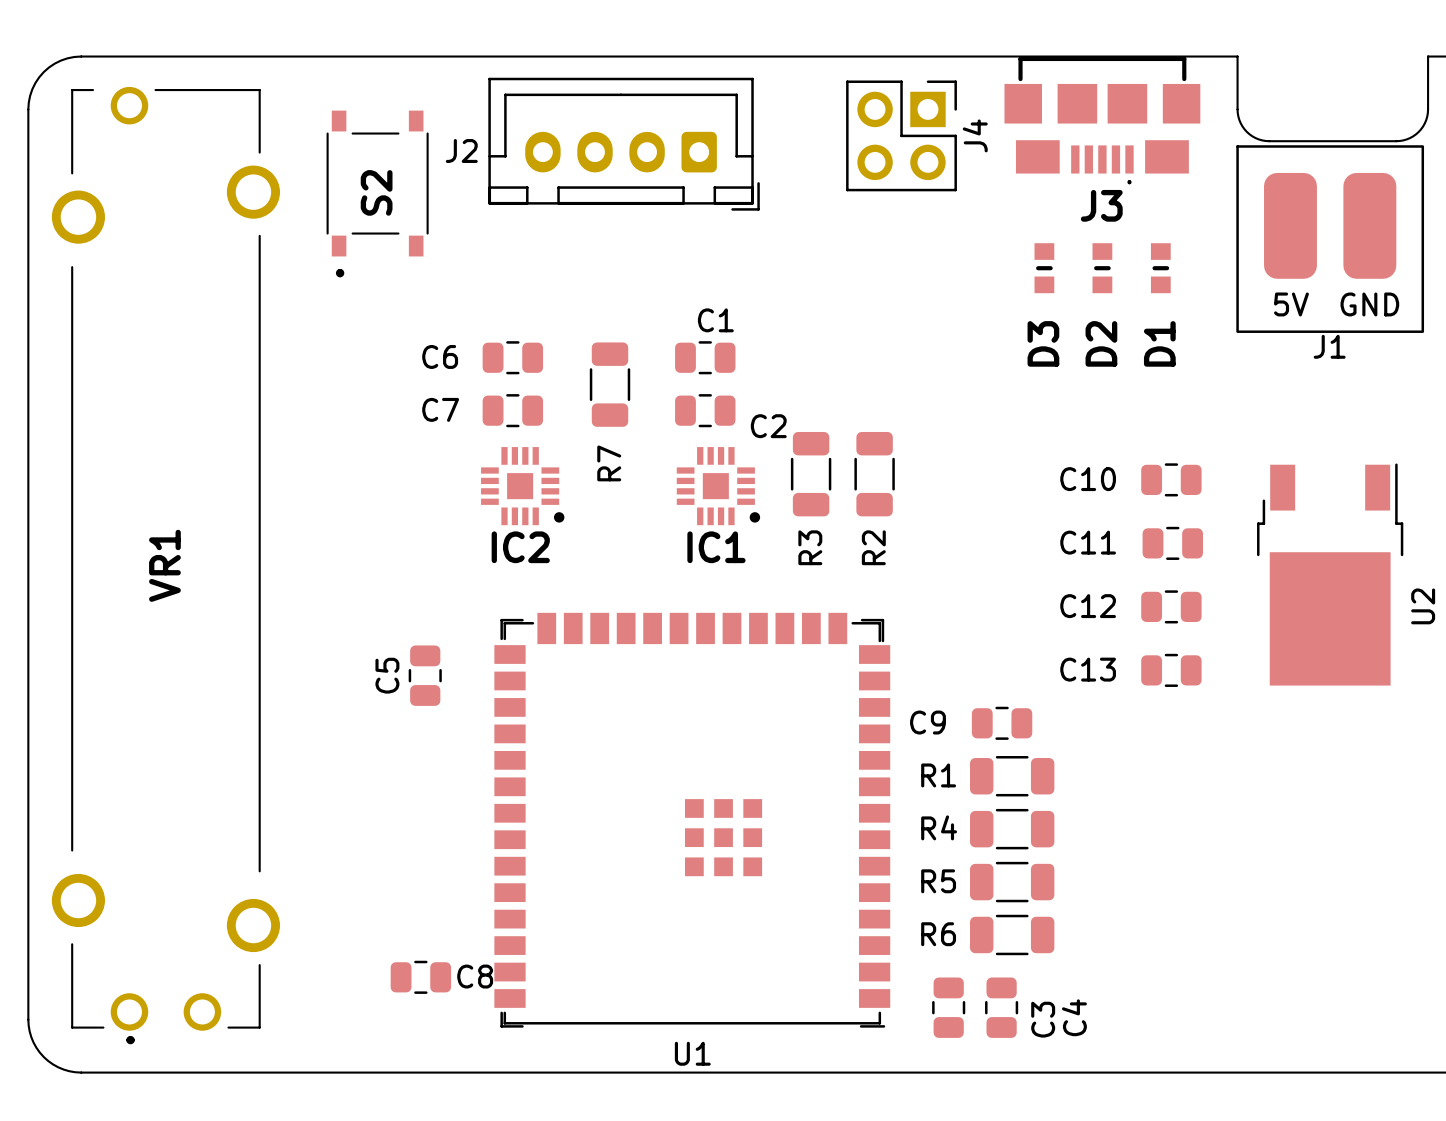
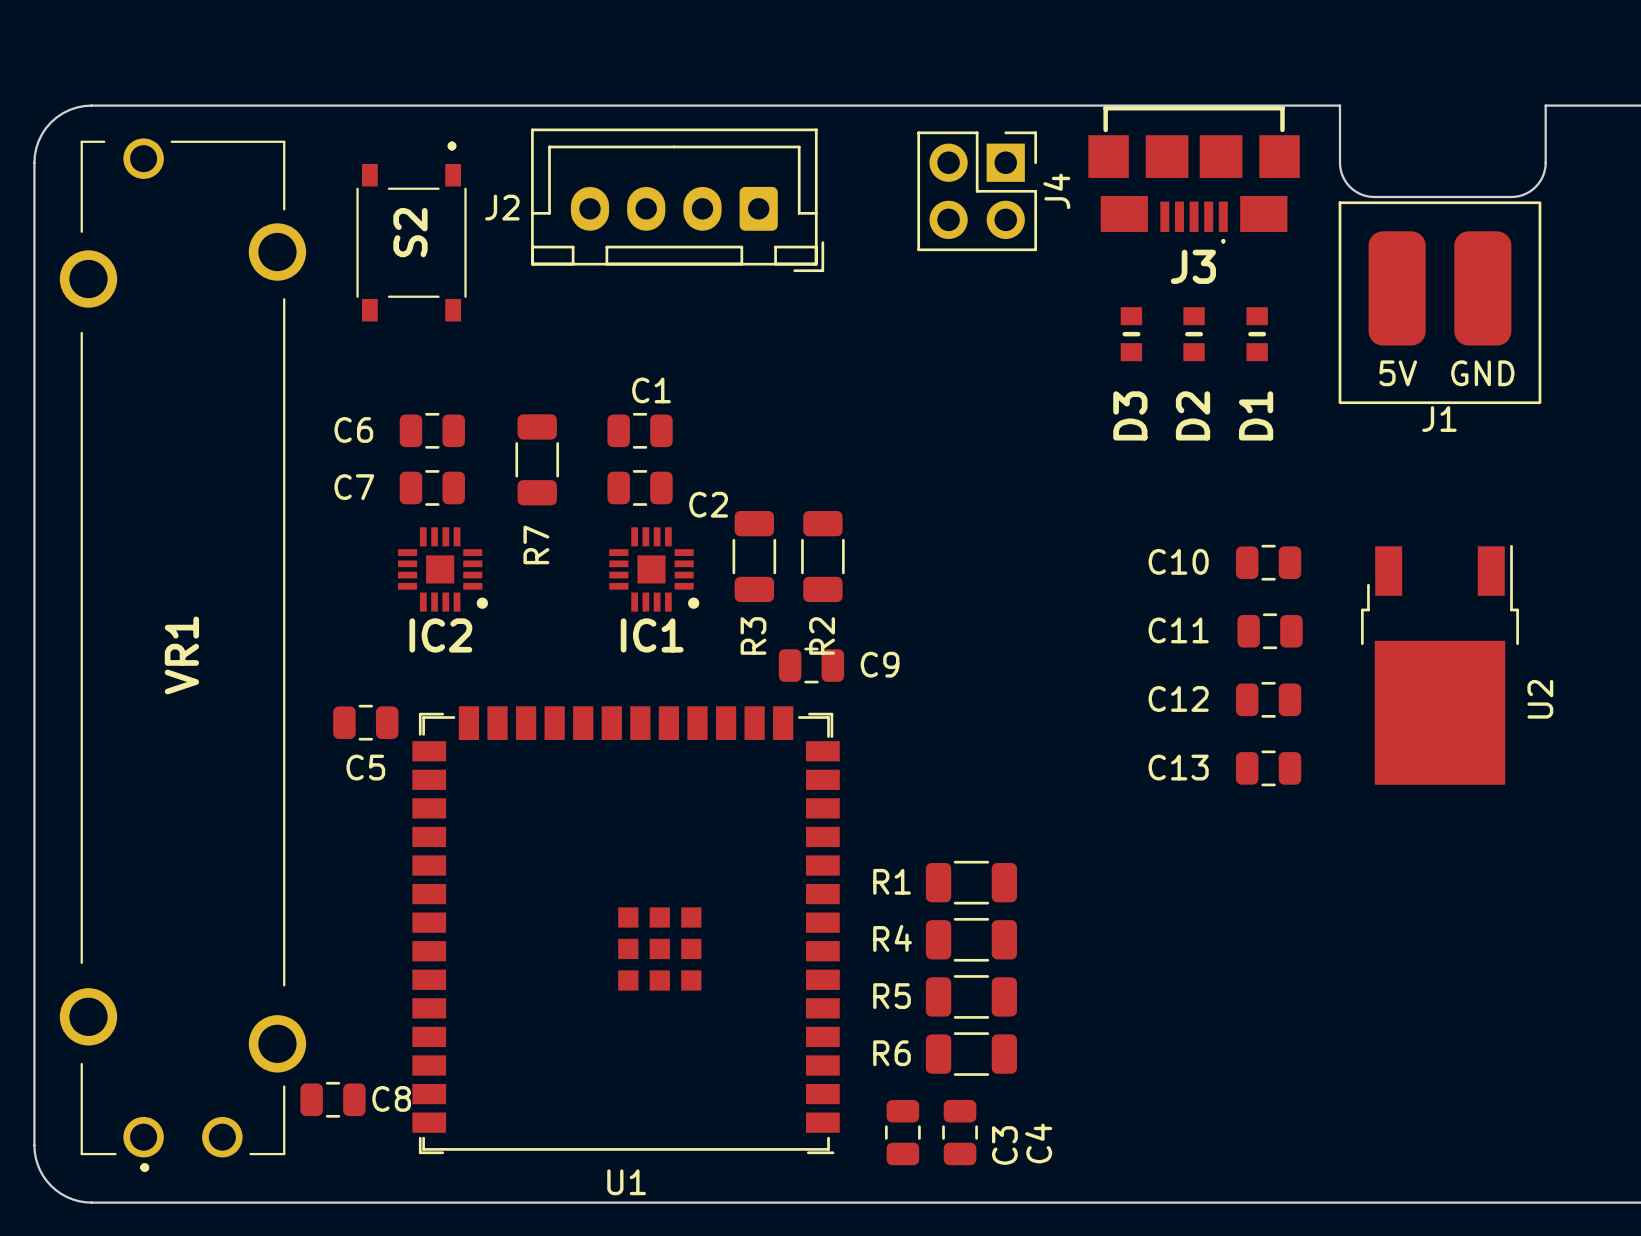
S2 rotation: 0° (377, 193) -> 180° (411, 231)
C6 position: (512, 357) -> (432, 430)
C1 position: (705, 357) -> (640, 430)
R7 position: (610, 384) -> (537, 459)
C7 position: (512, 410) -> (432, 487)
C2 position: (705, 410) -> (640, 487)
R3 position: (811, 474) -> (754, 556)
R2 position: (874, 474) -> (822, 556)
IC2 position: (522, 486) -> (442, 569)
IC1 position: (718, 486) -> (654, 569)
C5 name position: C5 (387, 675) -> C5 (365, 767)
C5 rotation: 0° (425, 675) -> 90° clockwise (365, 722)
C5 position: (425, 675) -> (365, 722)
C9 name position: C9 (927, 722) -> C9 (880, 664)
C9 position: (1002, 723) -> (811, 665)
R1 position: (1012, 776) -> (971, 882)
U1 position: (692, 820) -> (626, 930)
R4 position: (1012, 829) -> (971, 939)
R5 position: (1012, 882) -> (971, 996)
R6 position: (1012, 934) -> (971, 1054)
C8 position: (420, 977) -> (333, 1099)
C3 position: (948, 1007) -> (902, 1132)
C4 position: (1001, 1007) -> (960, 1132)

